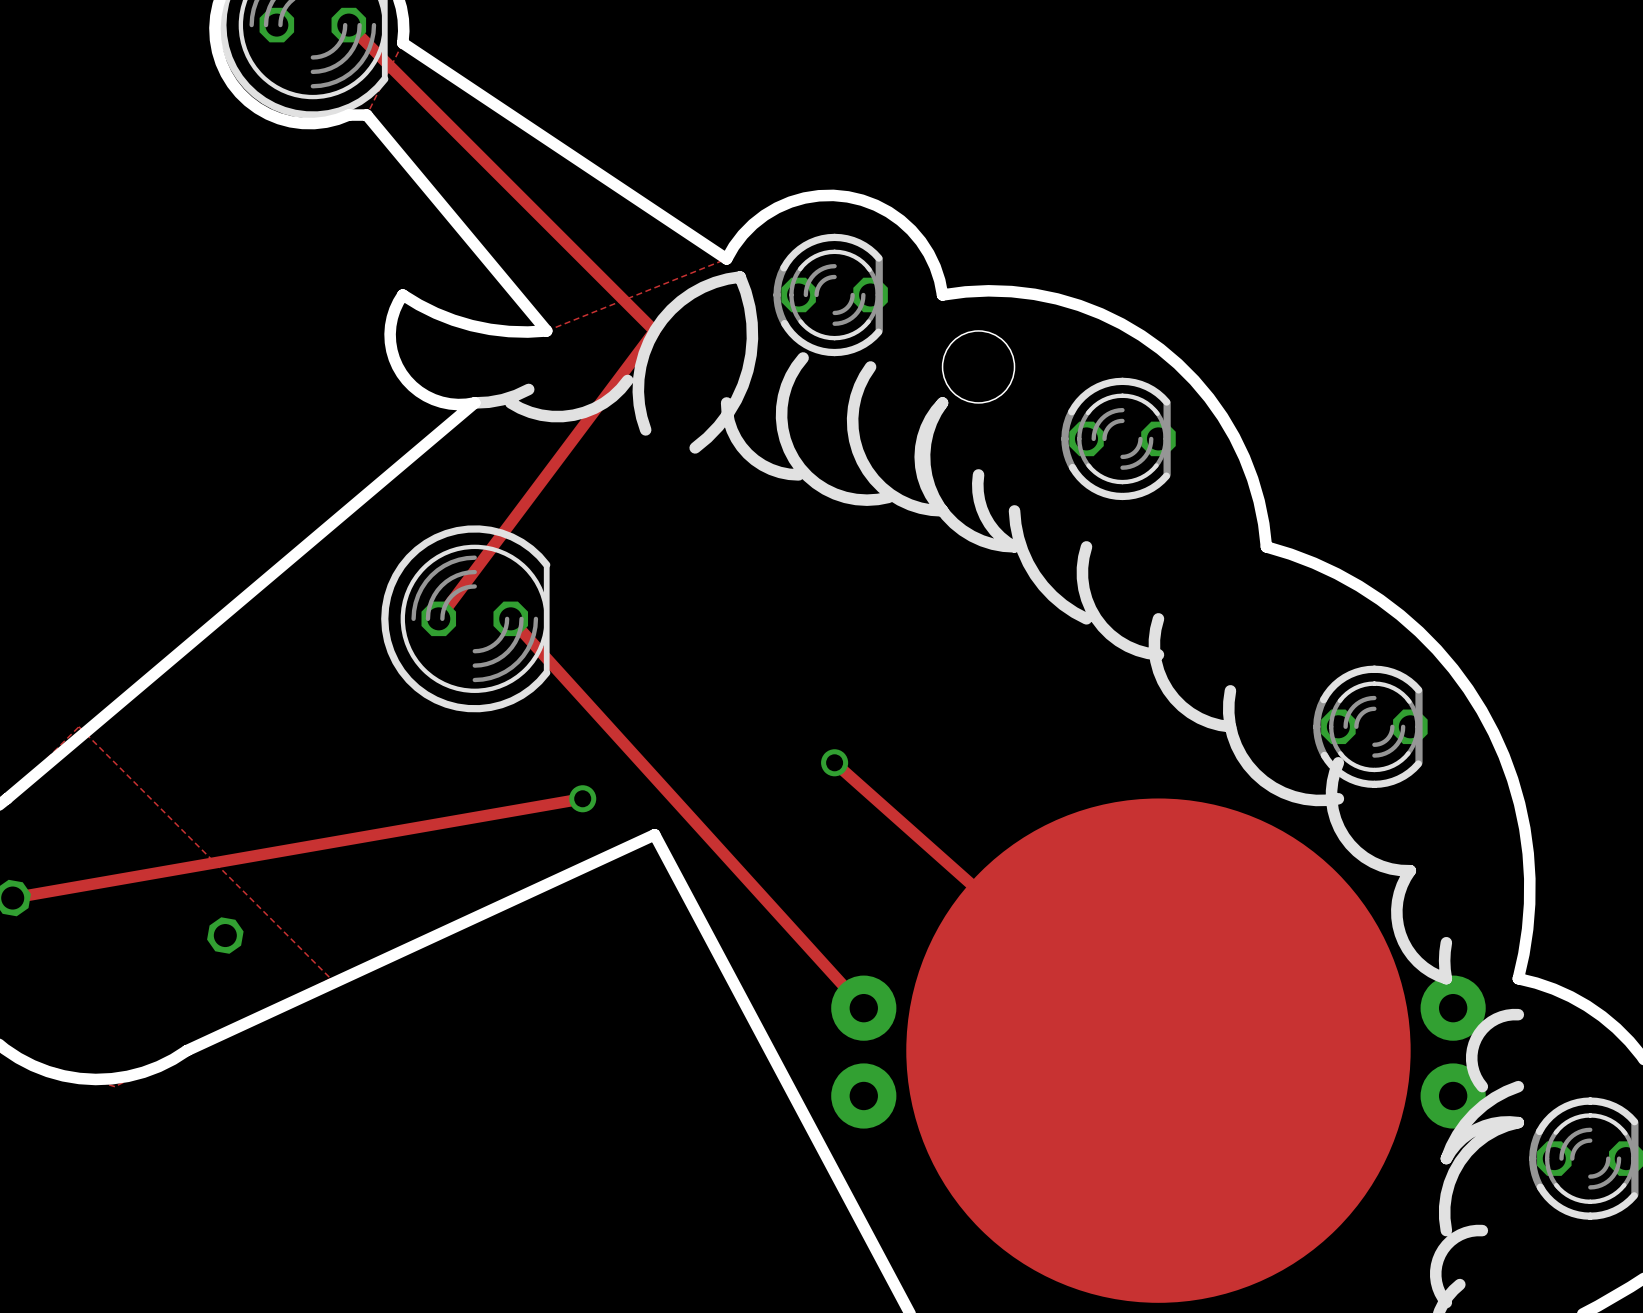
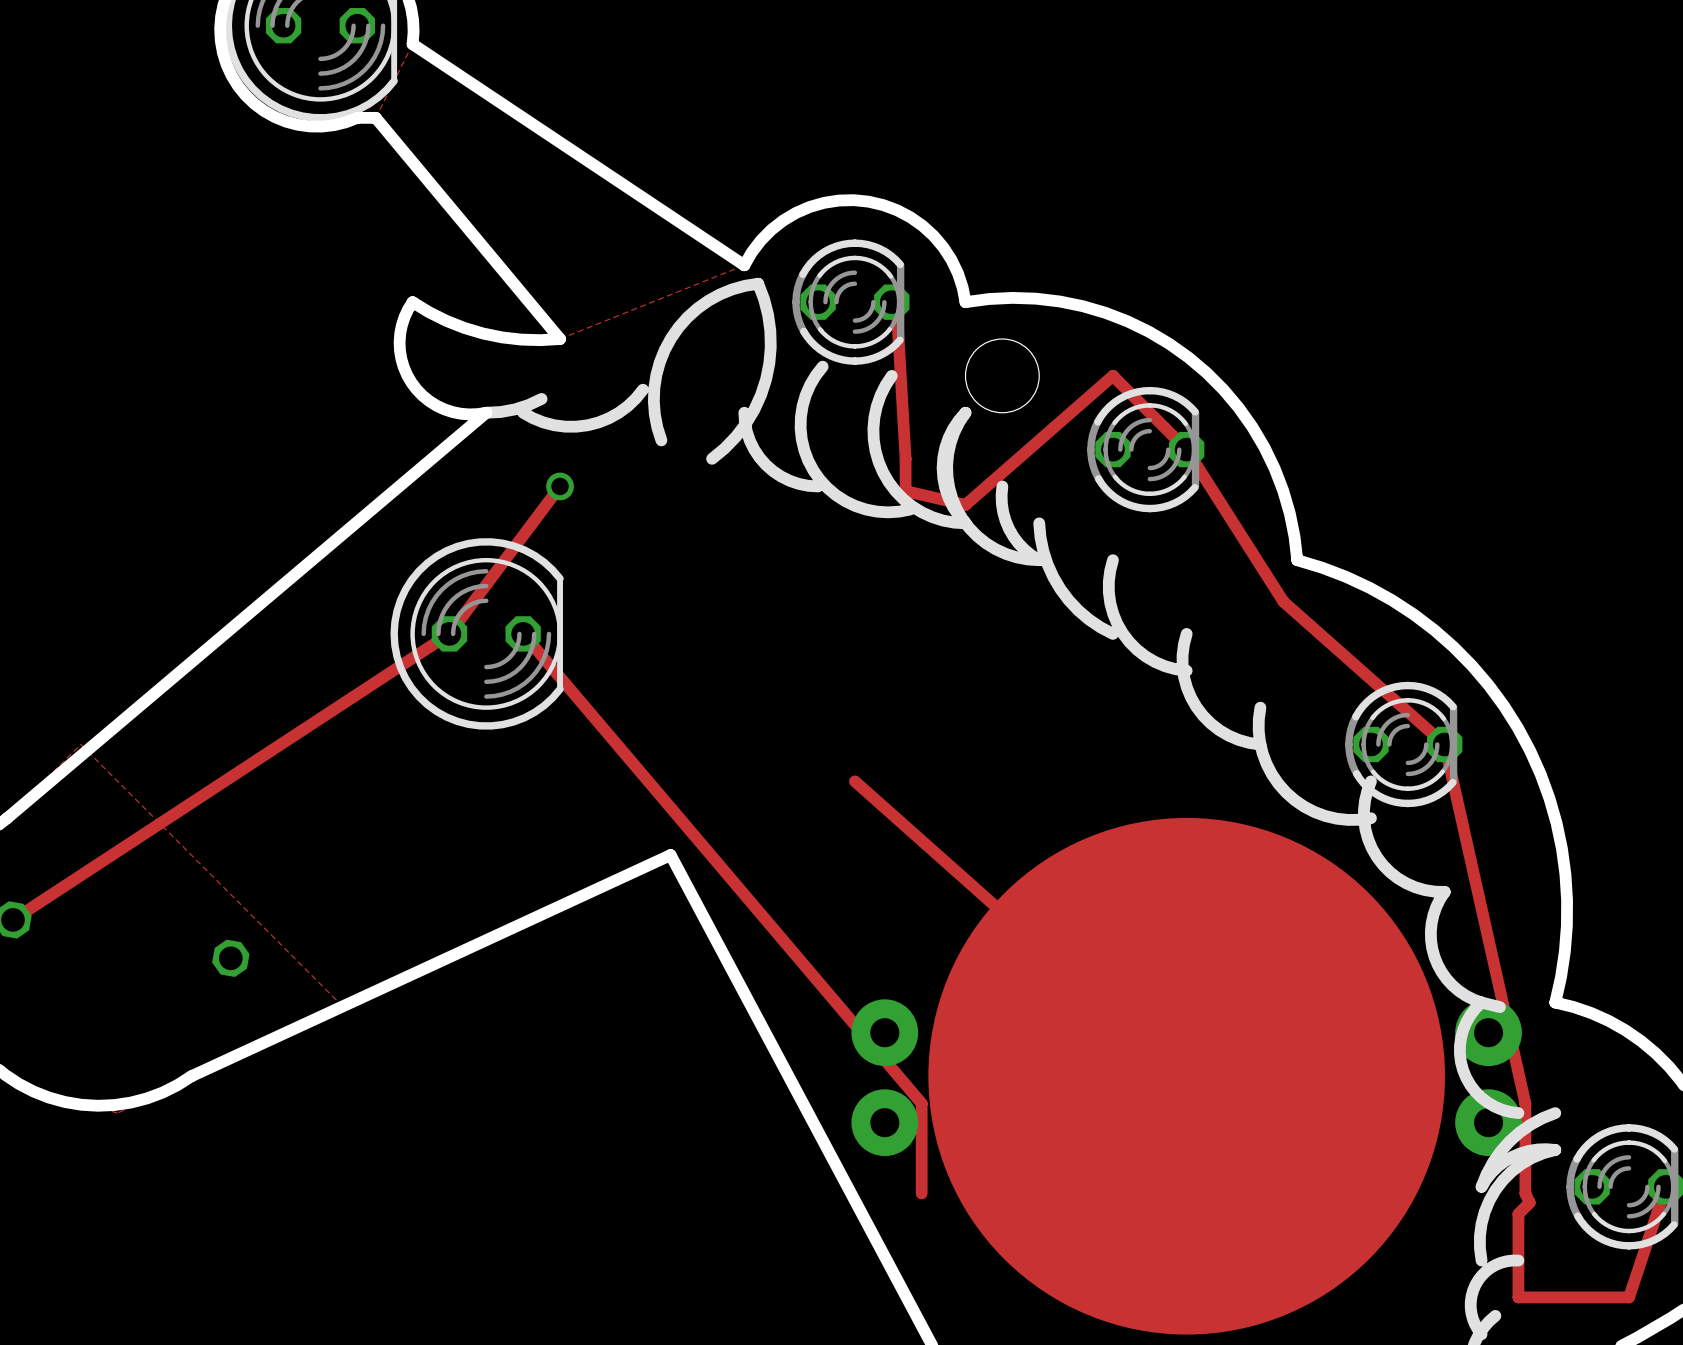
track: (348, 25) (654, 330) (546, 474) -> none
track: none -> (891, 302) (896, 302) (905, 458) (905, 491) (965, 504) (1112, 375) (1186, 449) (1283, 601) (1444, 744) (1525, 1103) (1525, 1193) (1529, 1202) (1518, 1214) (1518, 1297) (1629, 1297) (1665, 1186)
via: none -> (560, 486)
track: (510, 618) (863, 1008) -> (523, 633) (921, 1103) (921, 1193)
via: (834, 762) -> none
track: (582, 798) (12, 898) -> (449, 633) (13, 919)
via: (582, 798) -> none
line: (1446, 942) (1444, 960) (1446, 978) -> none
line: (1518, 1014) (1496, 1018) (1482, 1029) (1476, 1038) (1471, 1060) (1476, 1077) (1482, 1086) -> (1500, 1007) (1481, 1002) (1470, 1014) (1461, 1037) (1460, 1062) (1466, 1077) (1481, 1097) (1494, 1106) (1518, 1113)

